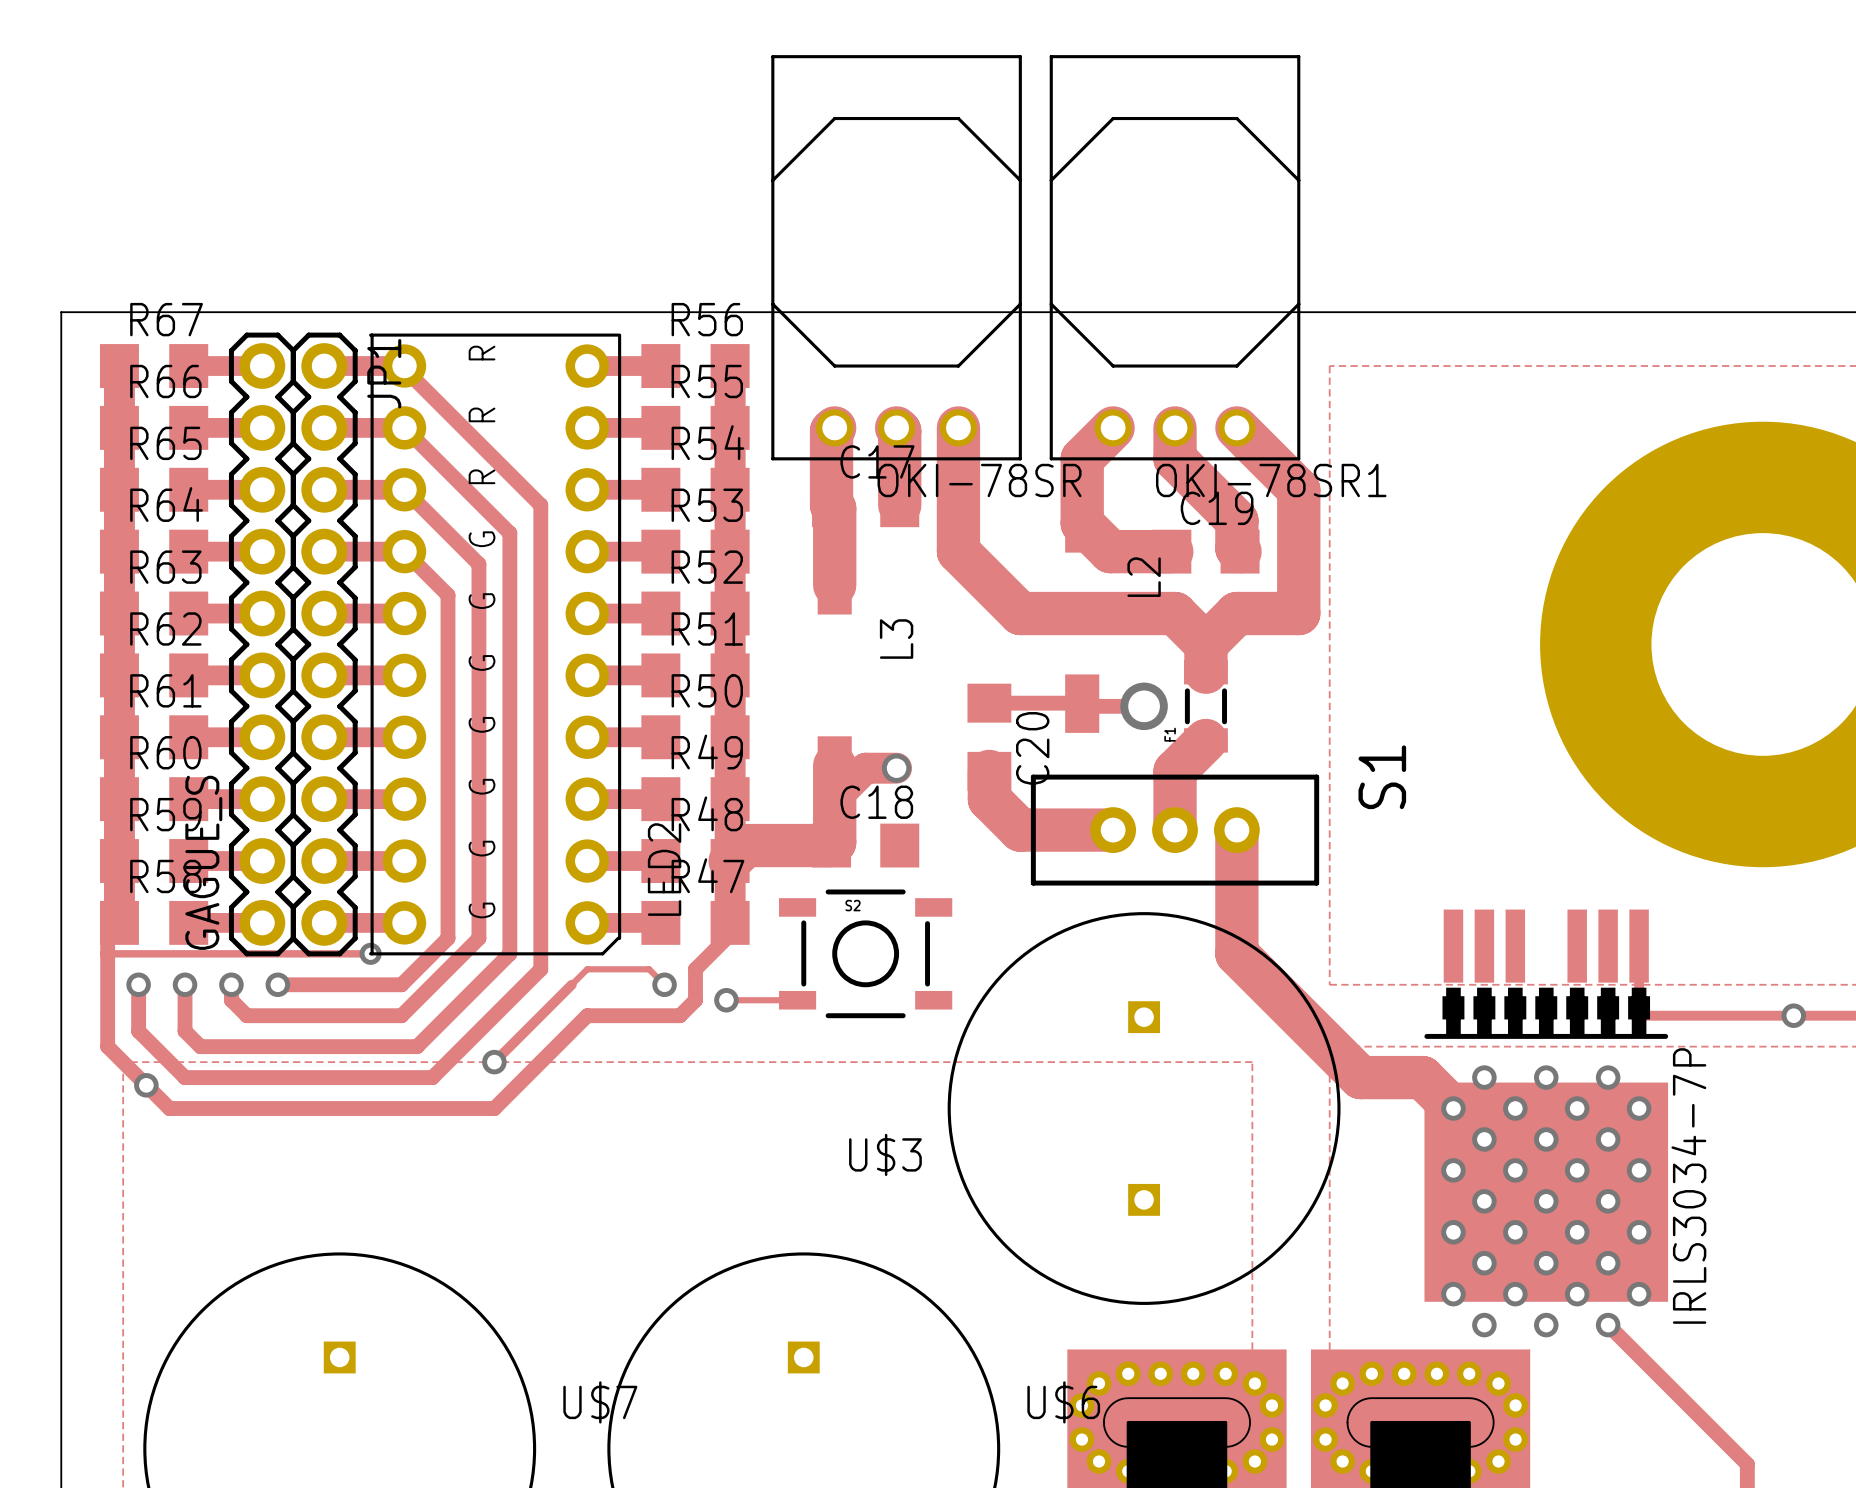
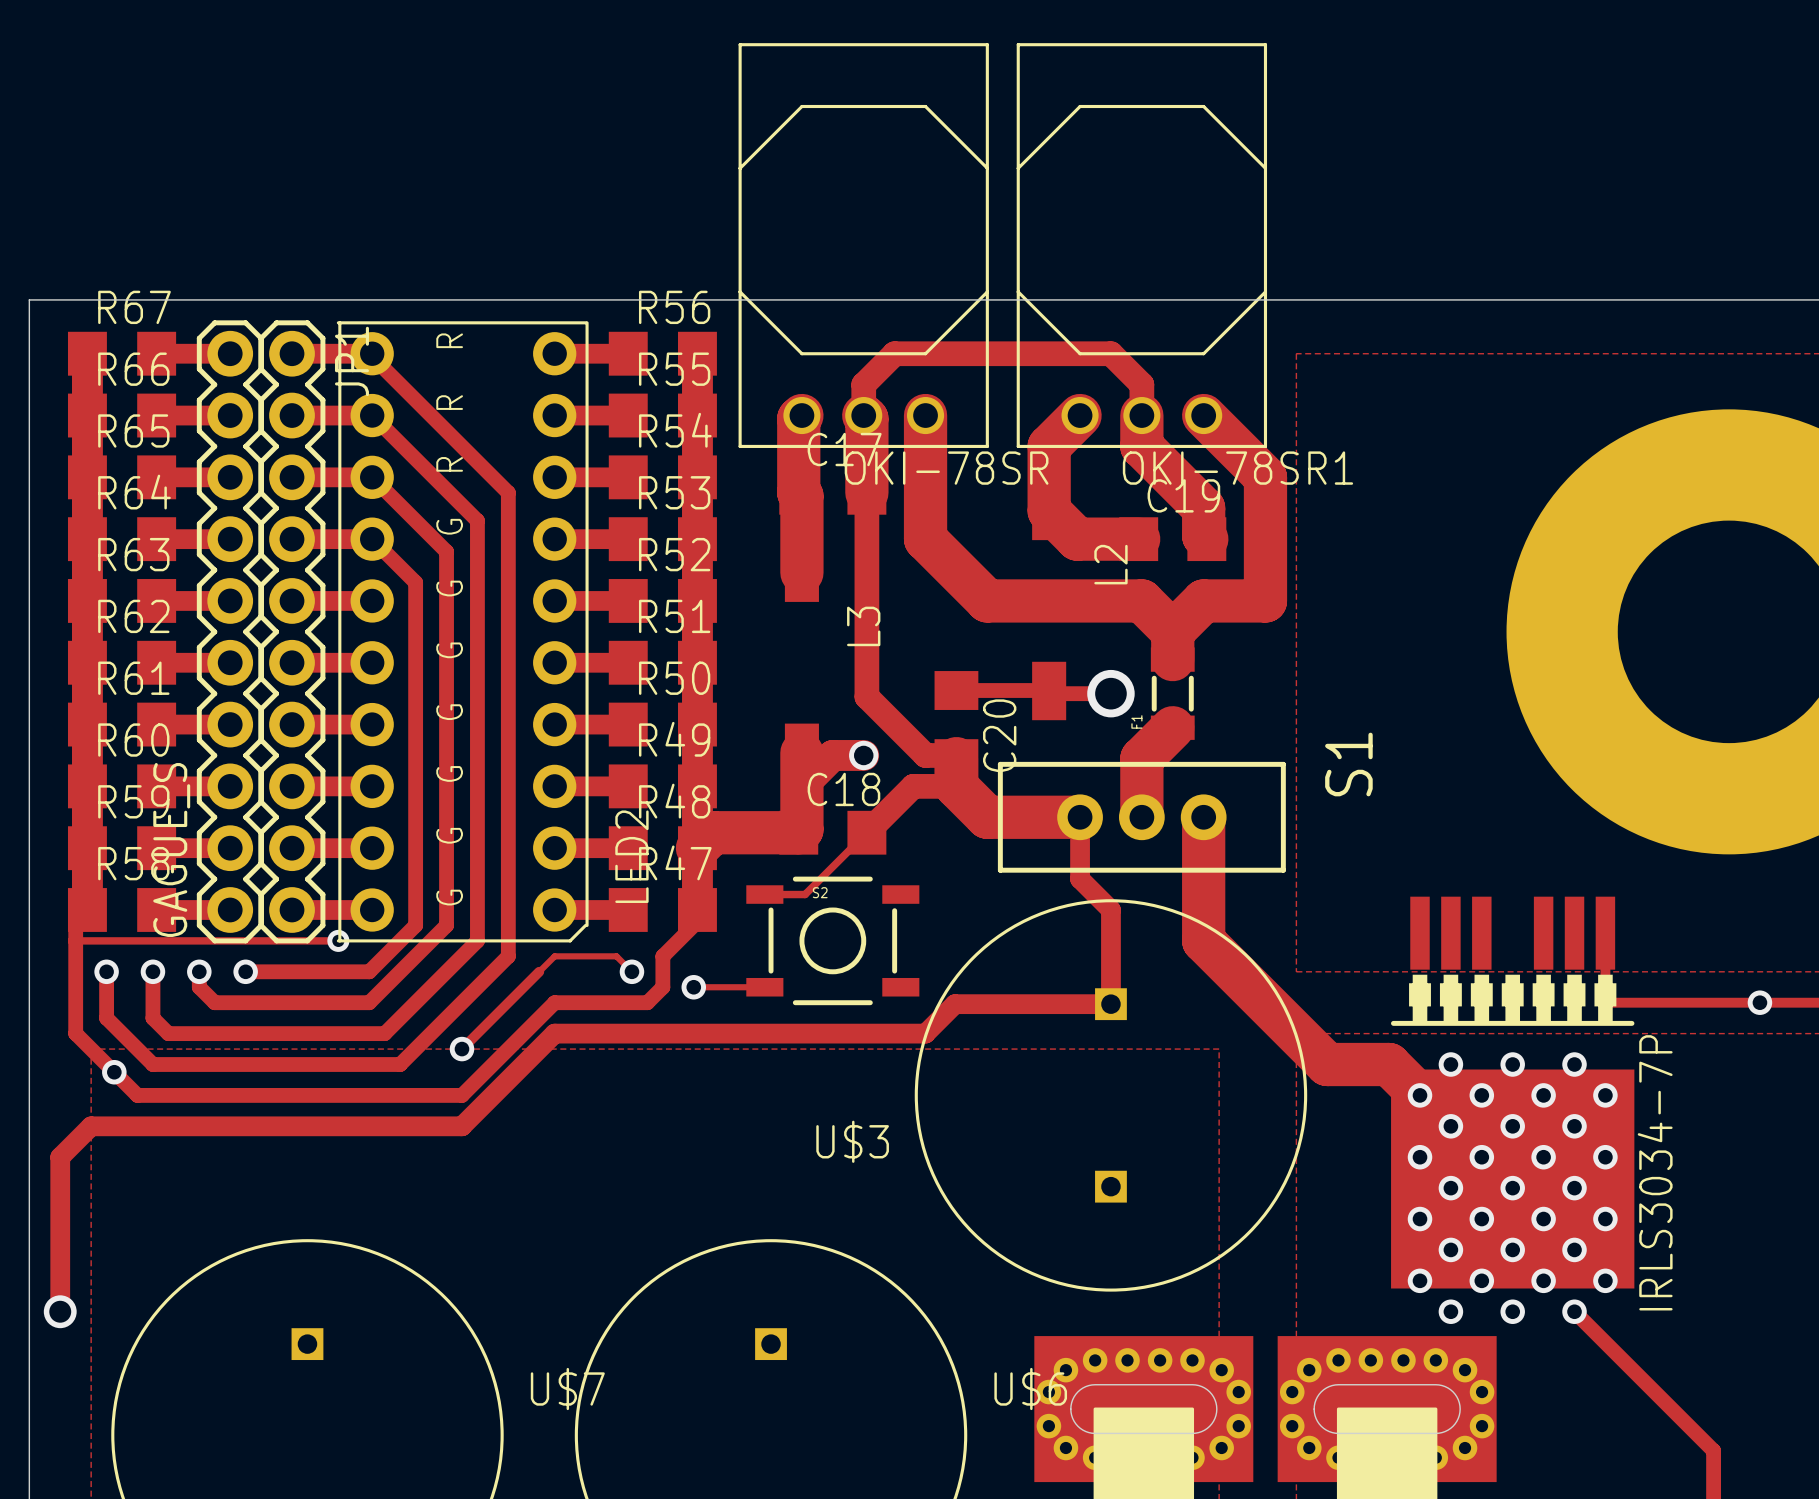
track: none -> (863, 415) (863, 384) (894, 353) (1110, 353) (1141, 384) (1141, 415)
track: none -> (866, 492) (866, 696) (925, 755) (953, 755) (956, 758)
track: none -> (956, 786) (913, 786) (805, 894) (764, 894)
track: none -> (1080, 817) (1080, 879) (1110, 909) (1110, 1004) (954, 1004) (925, 1033) (554, 1033) (461, 1126) (91, 1126) (60, 1157) (60, 1311)
via: none -> (60, 1311)

